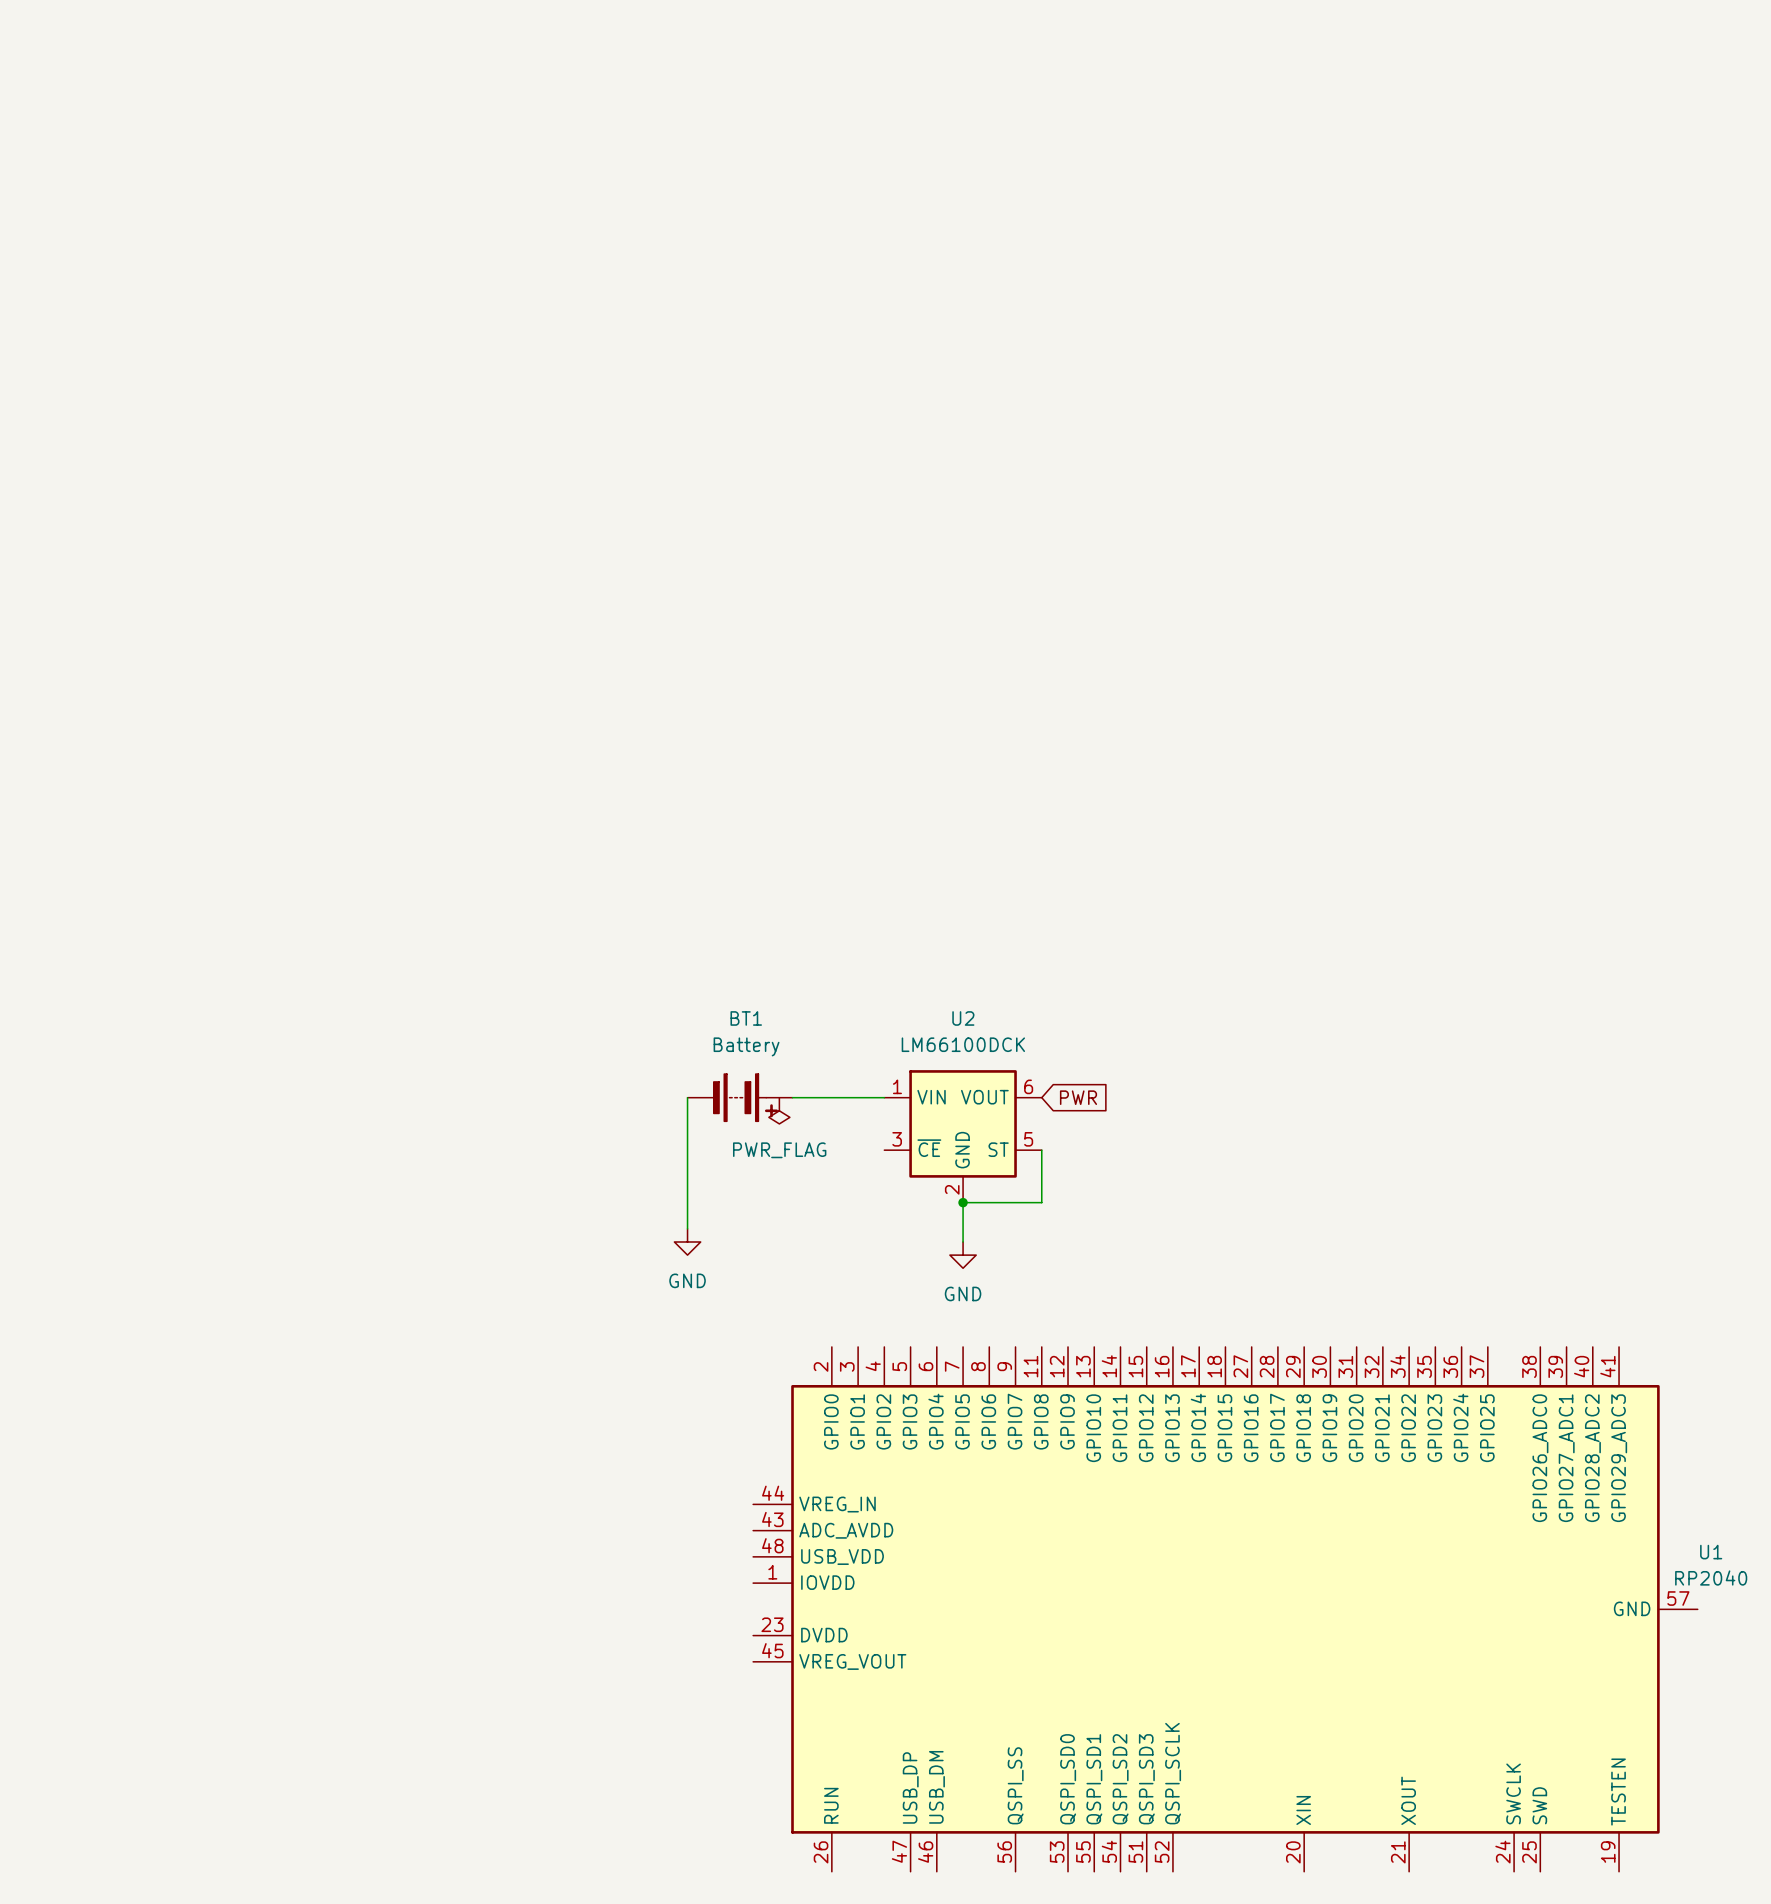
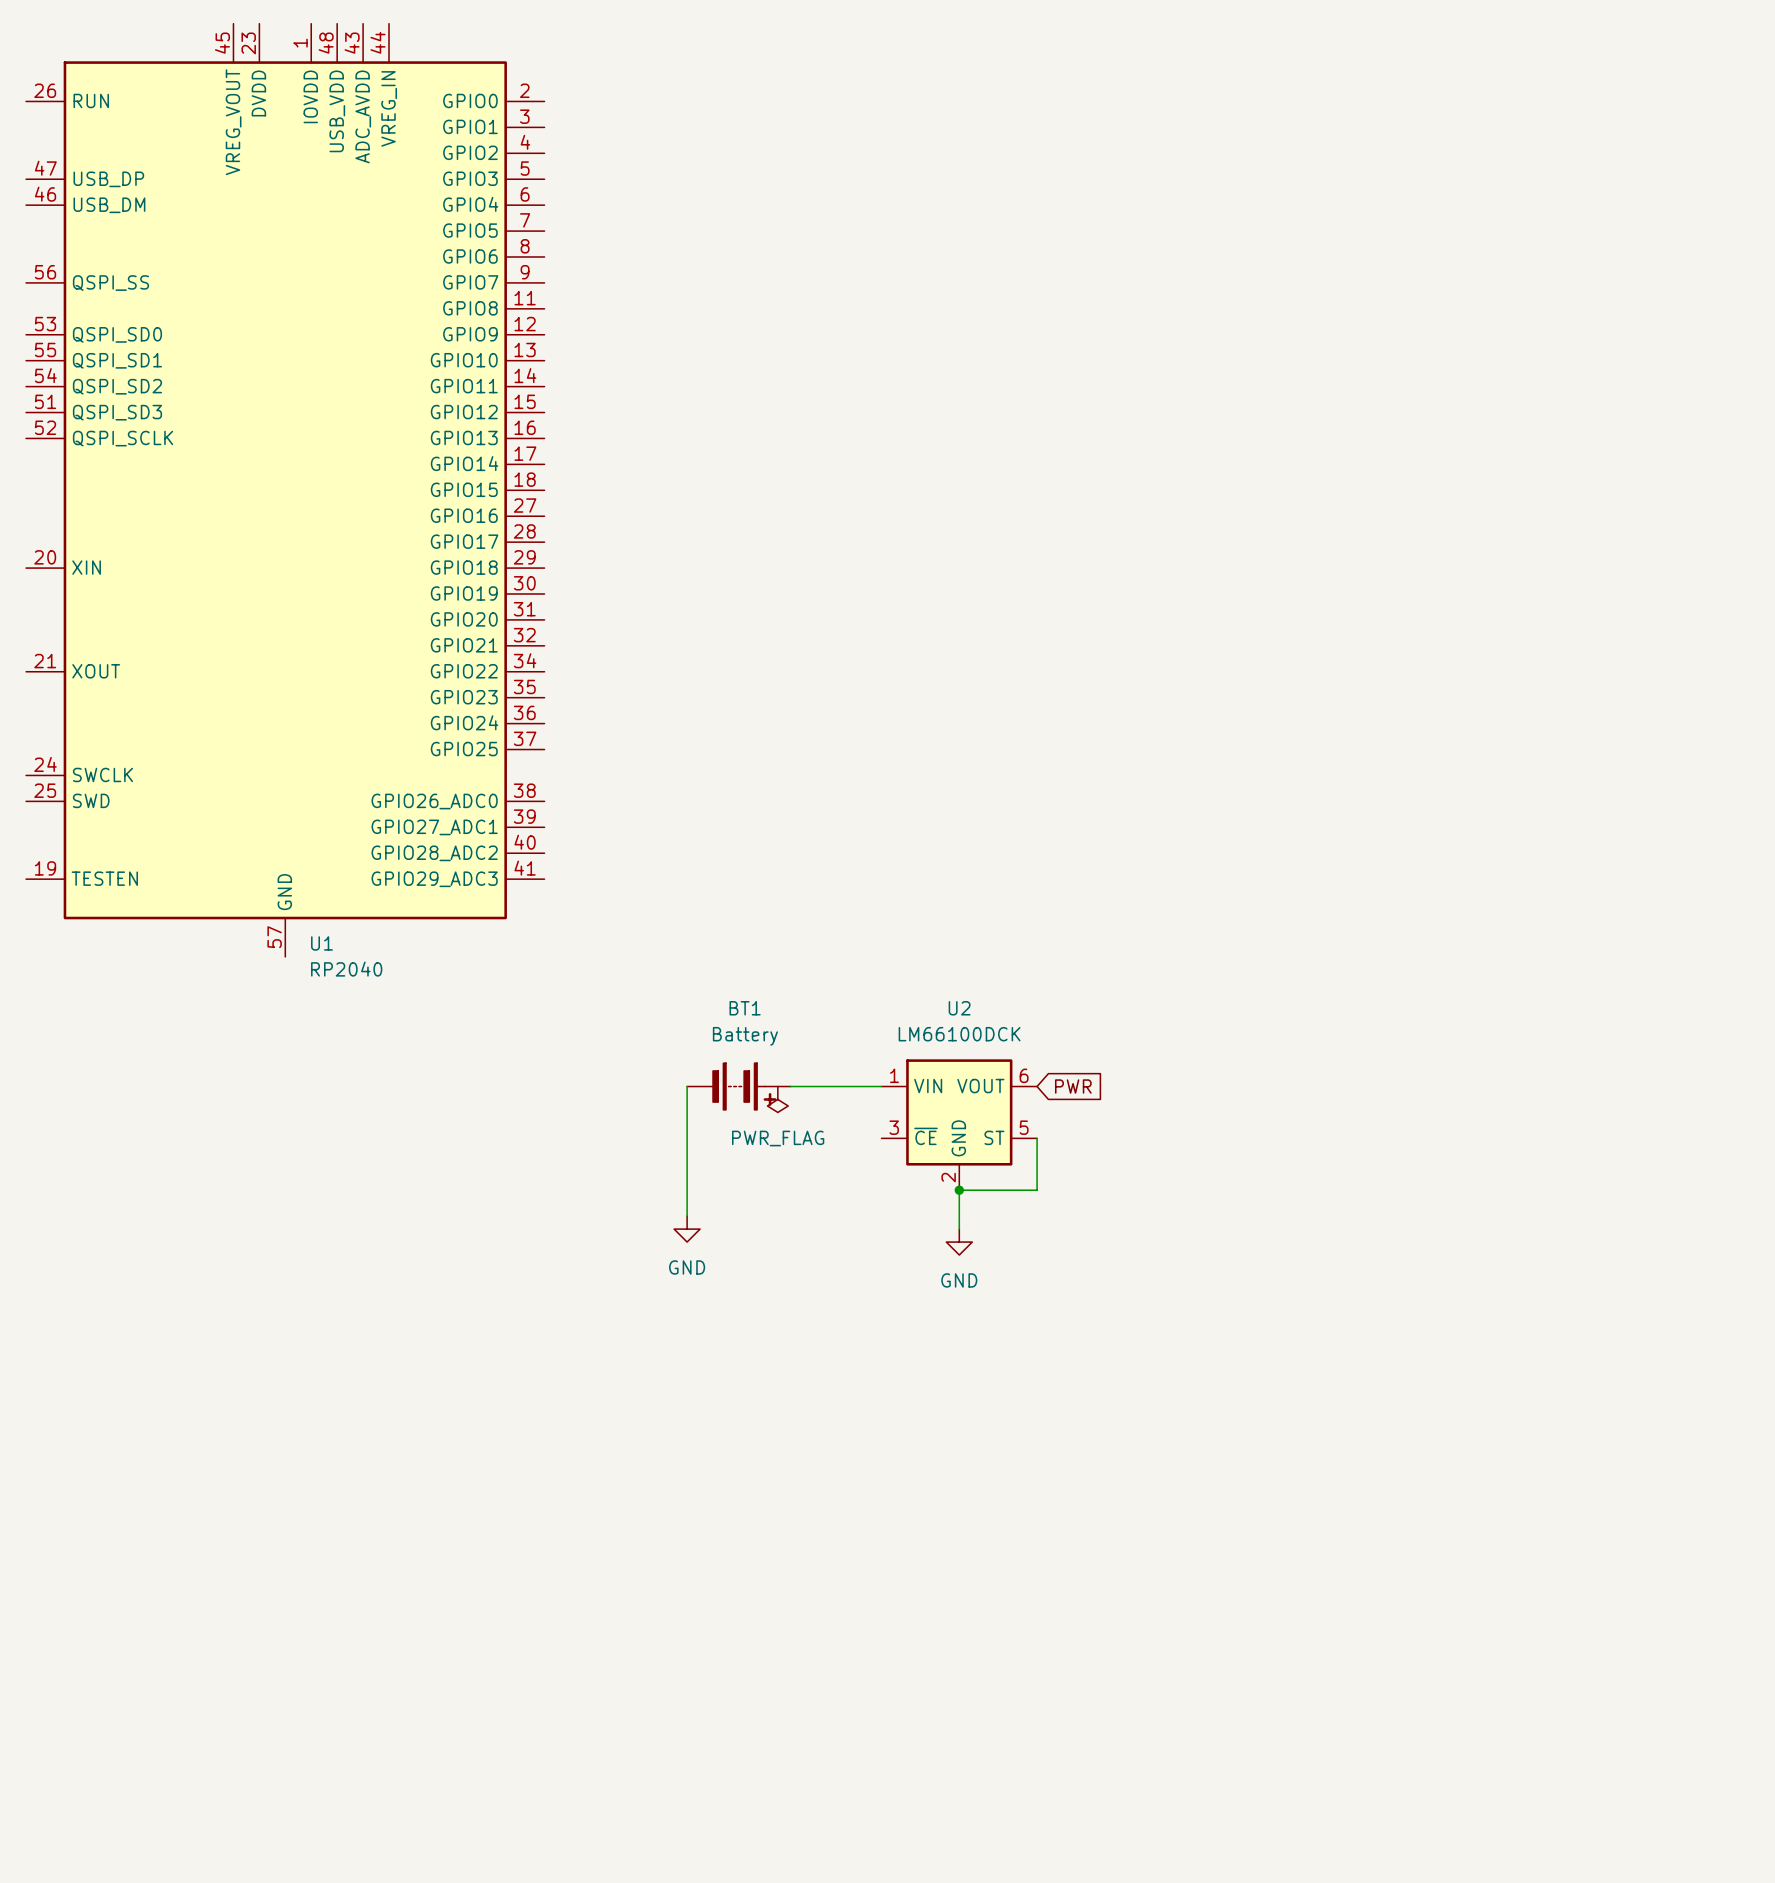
U1 name position: U1 (1711, 1552) -> U1 (321, 943)
U1 value position: RP2040 (1711, 1578) -> RP2040 (346, 969)
U1 rotation: 0° (1225, 1609) -> 90° clockwise (285, 490)
U1 position: (1225, 1609) -> (285, 490)

